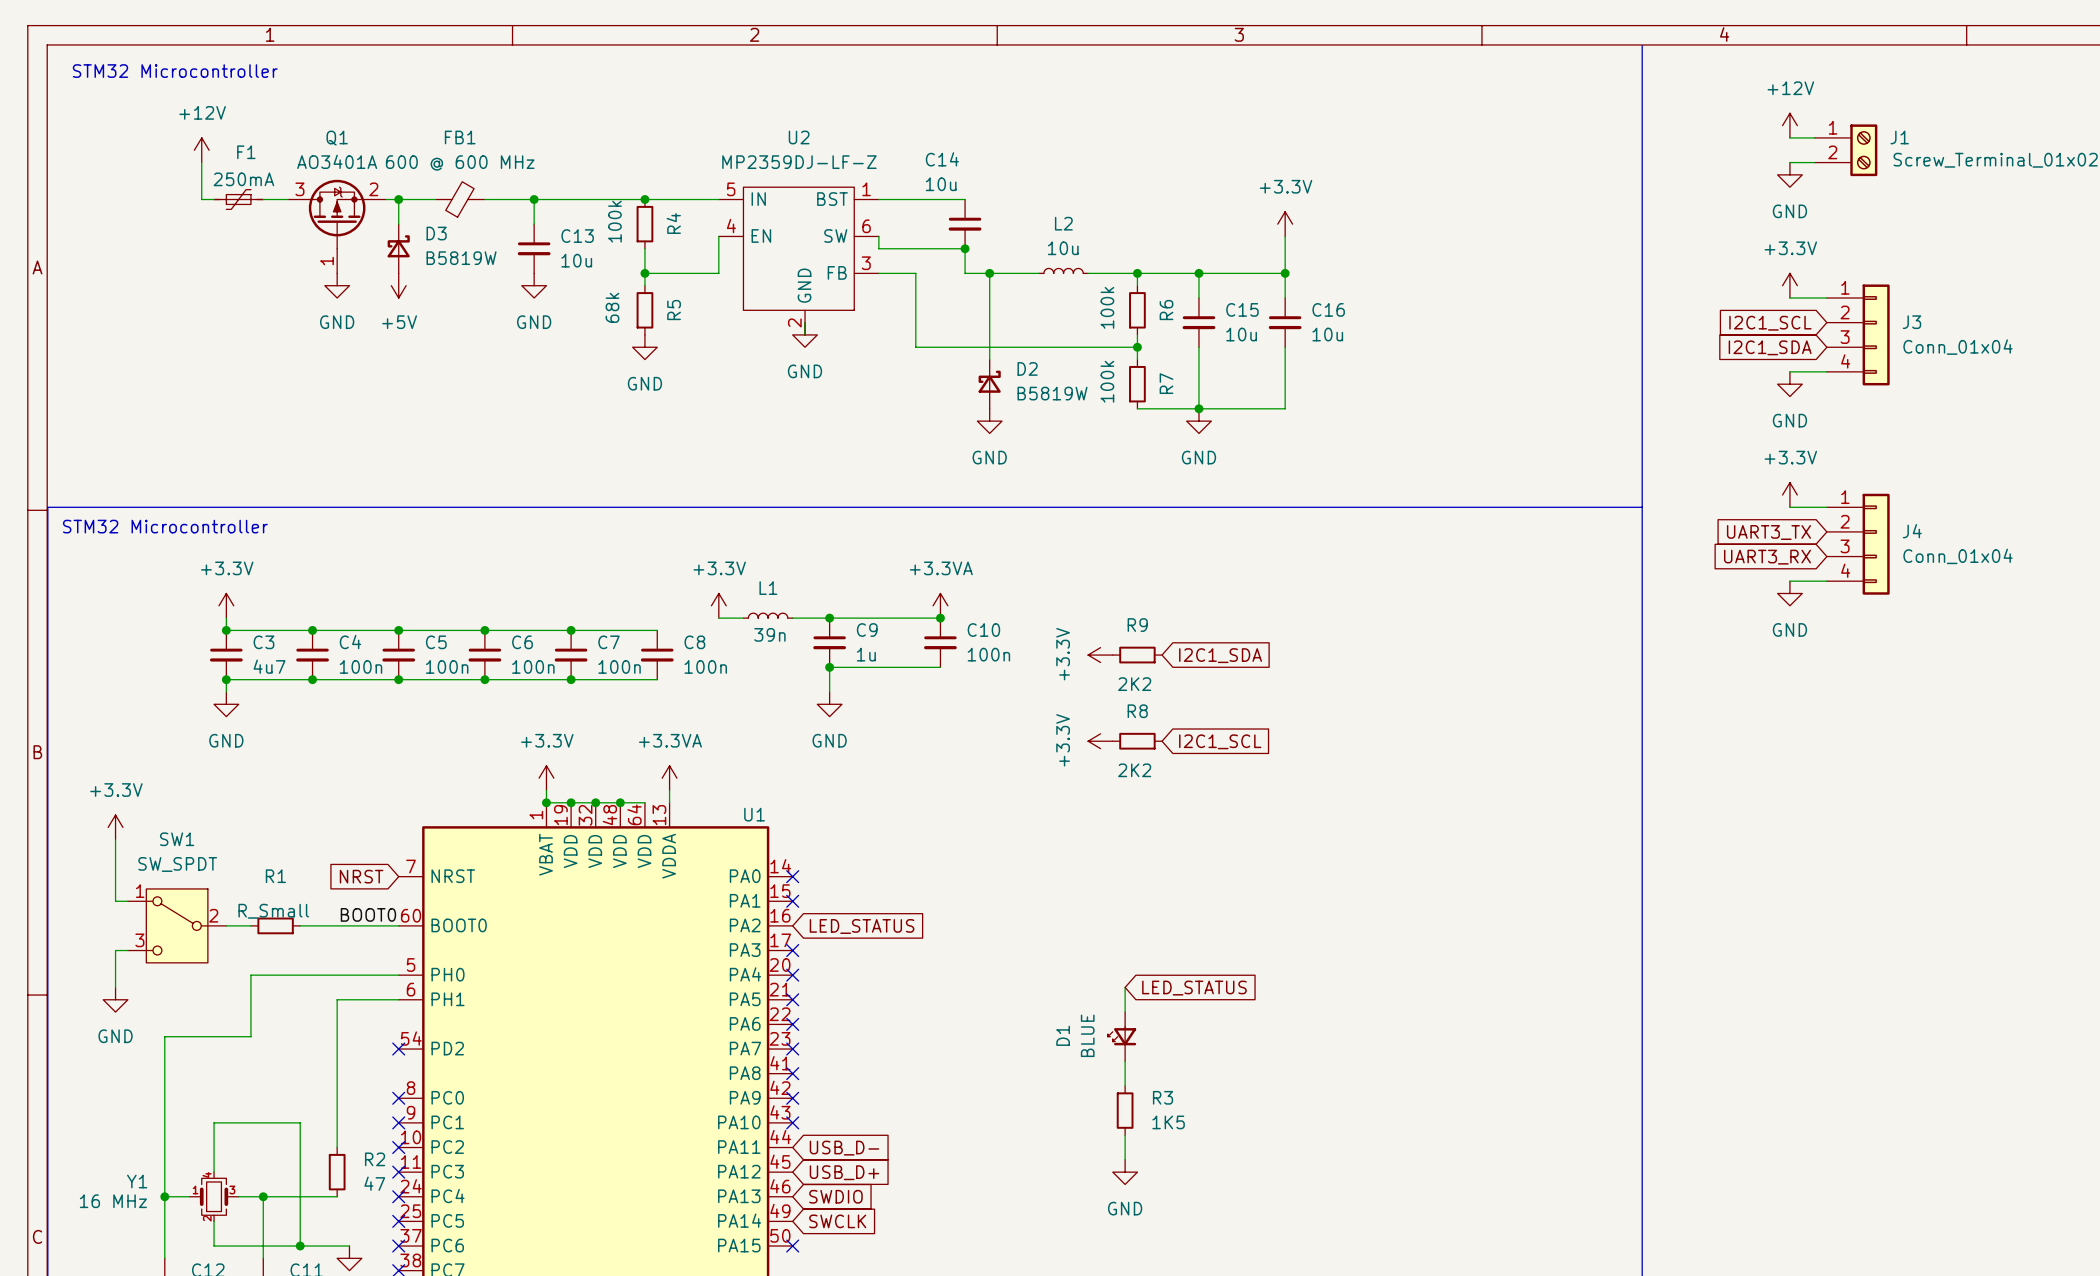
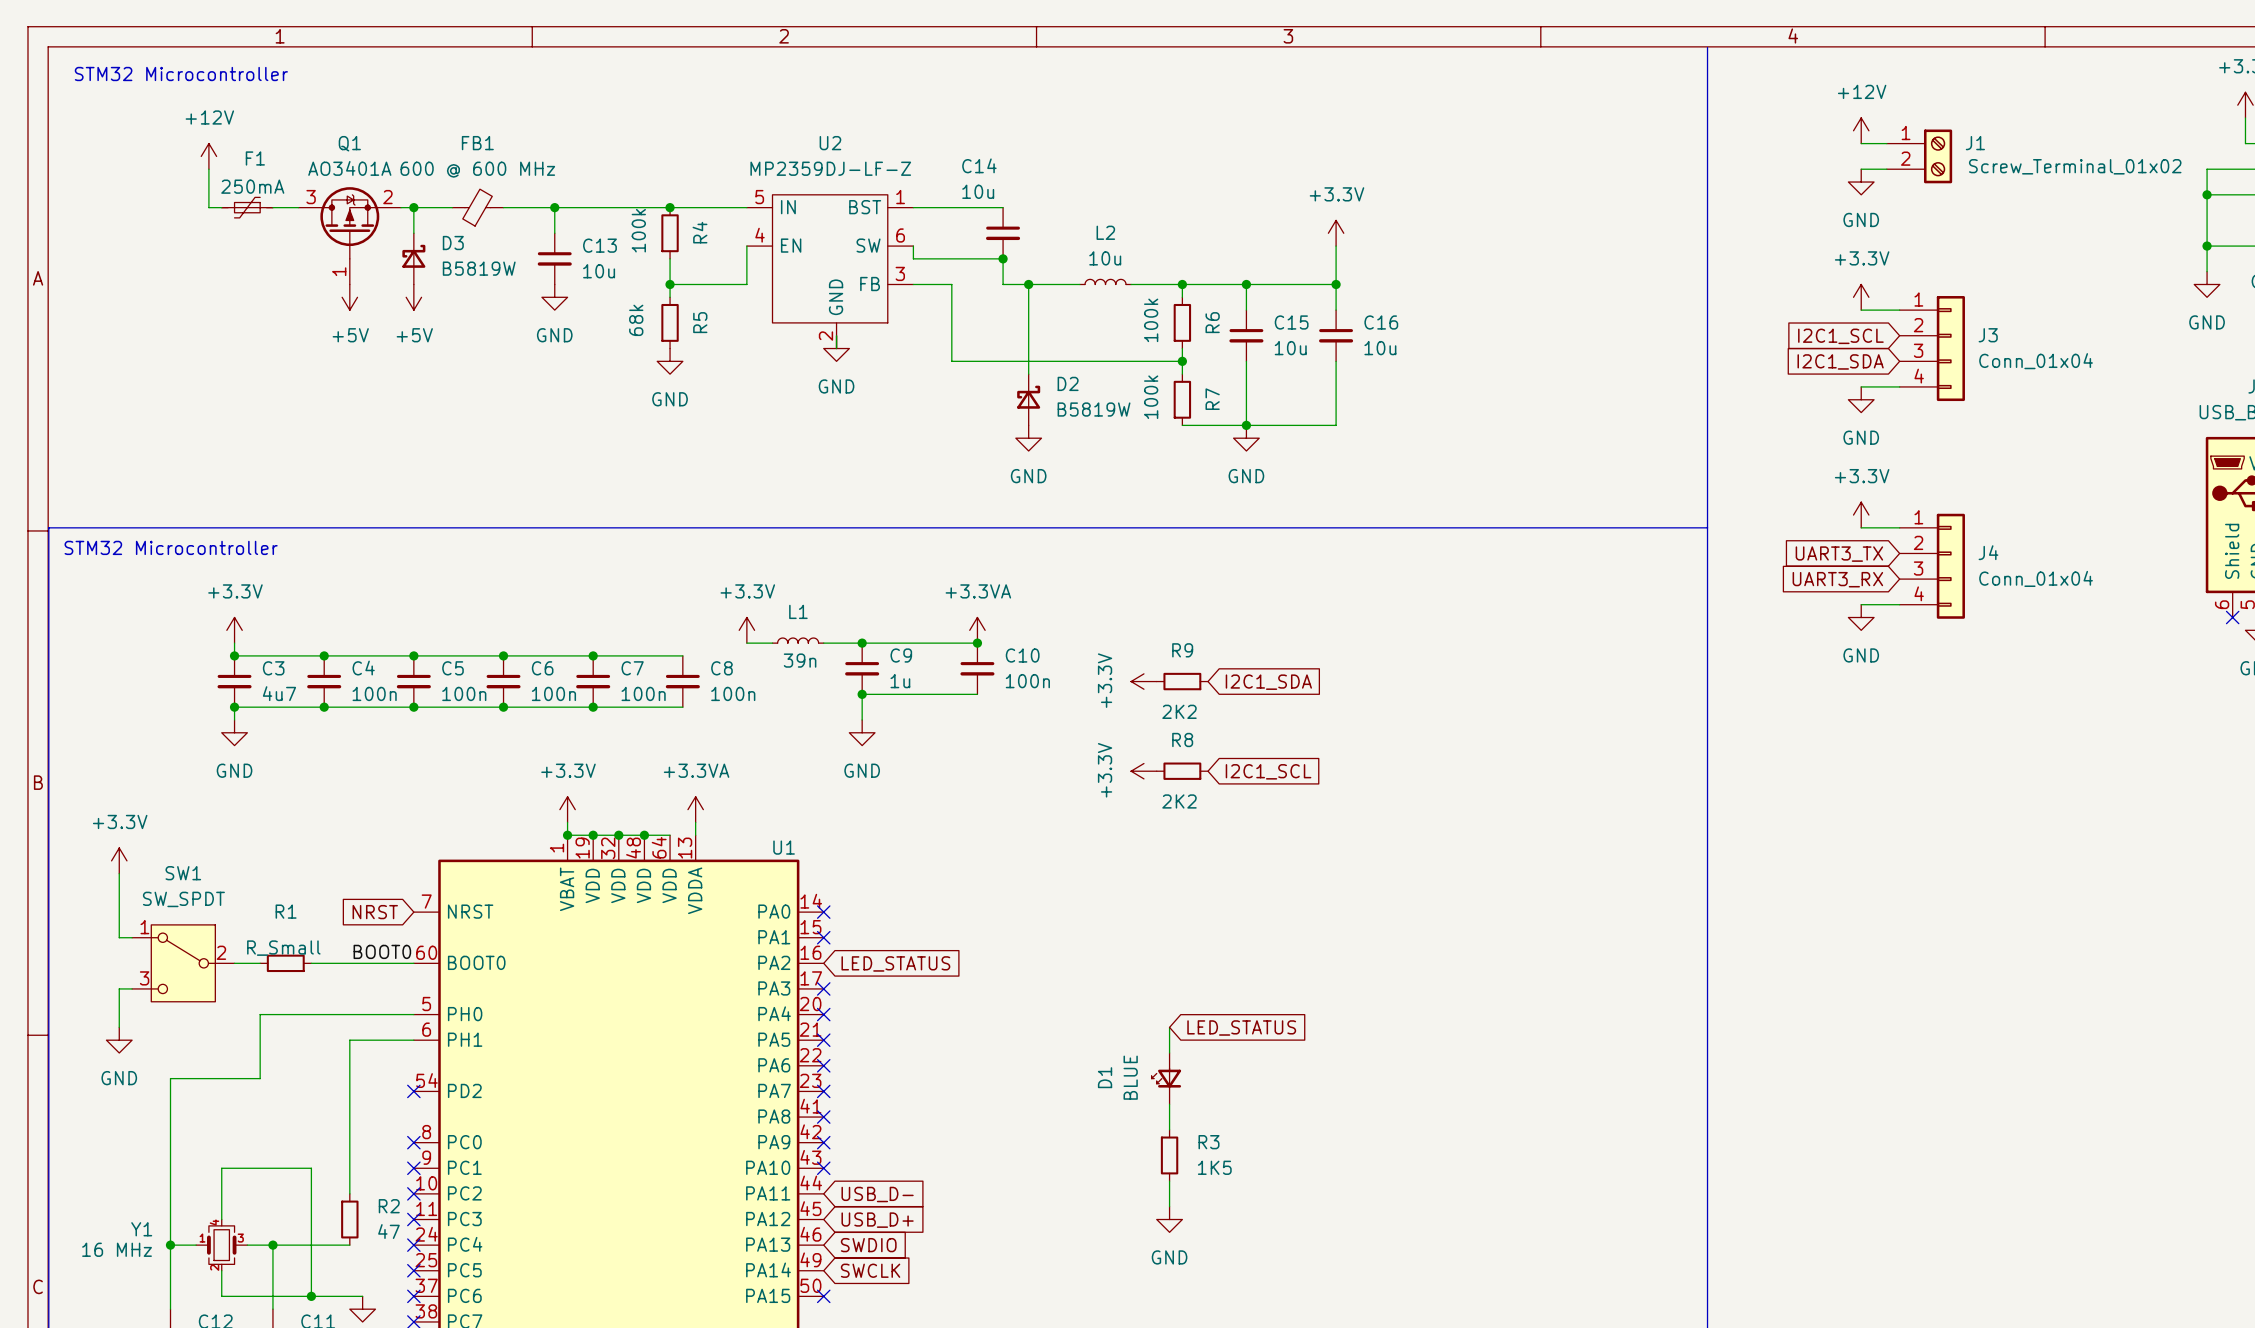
power symbol: GND (337, 285) -> +5V (349, 297)

